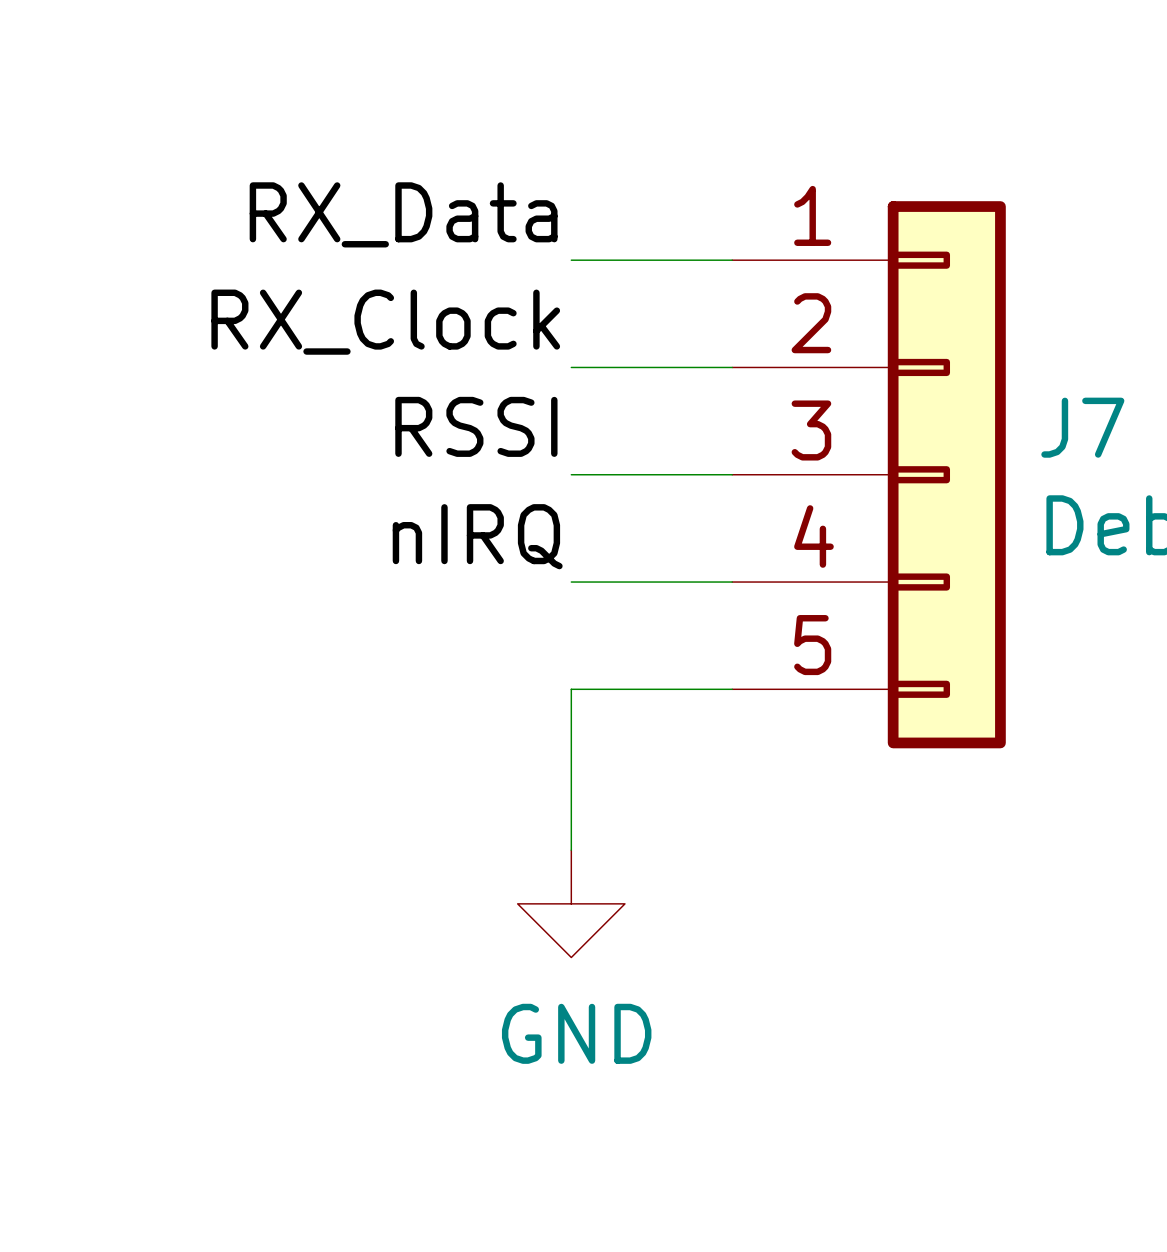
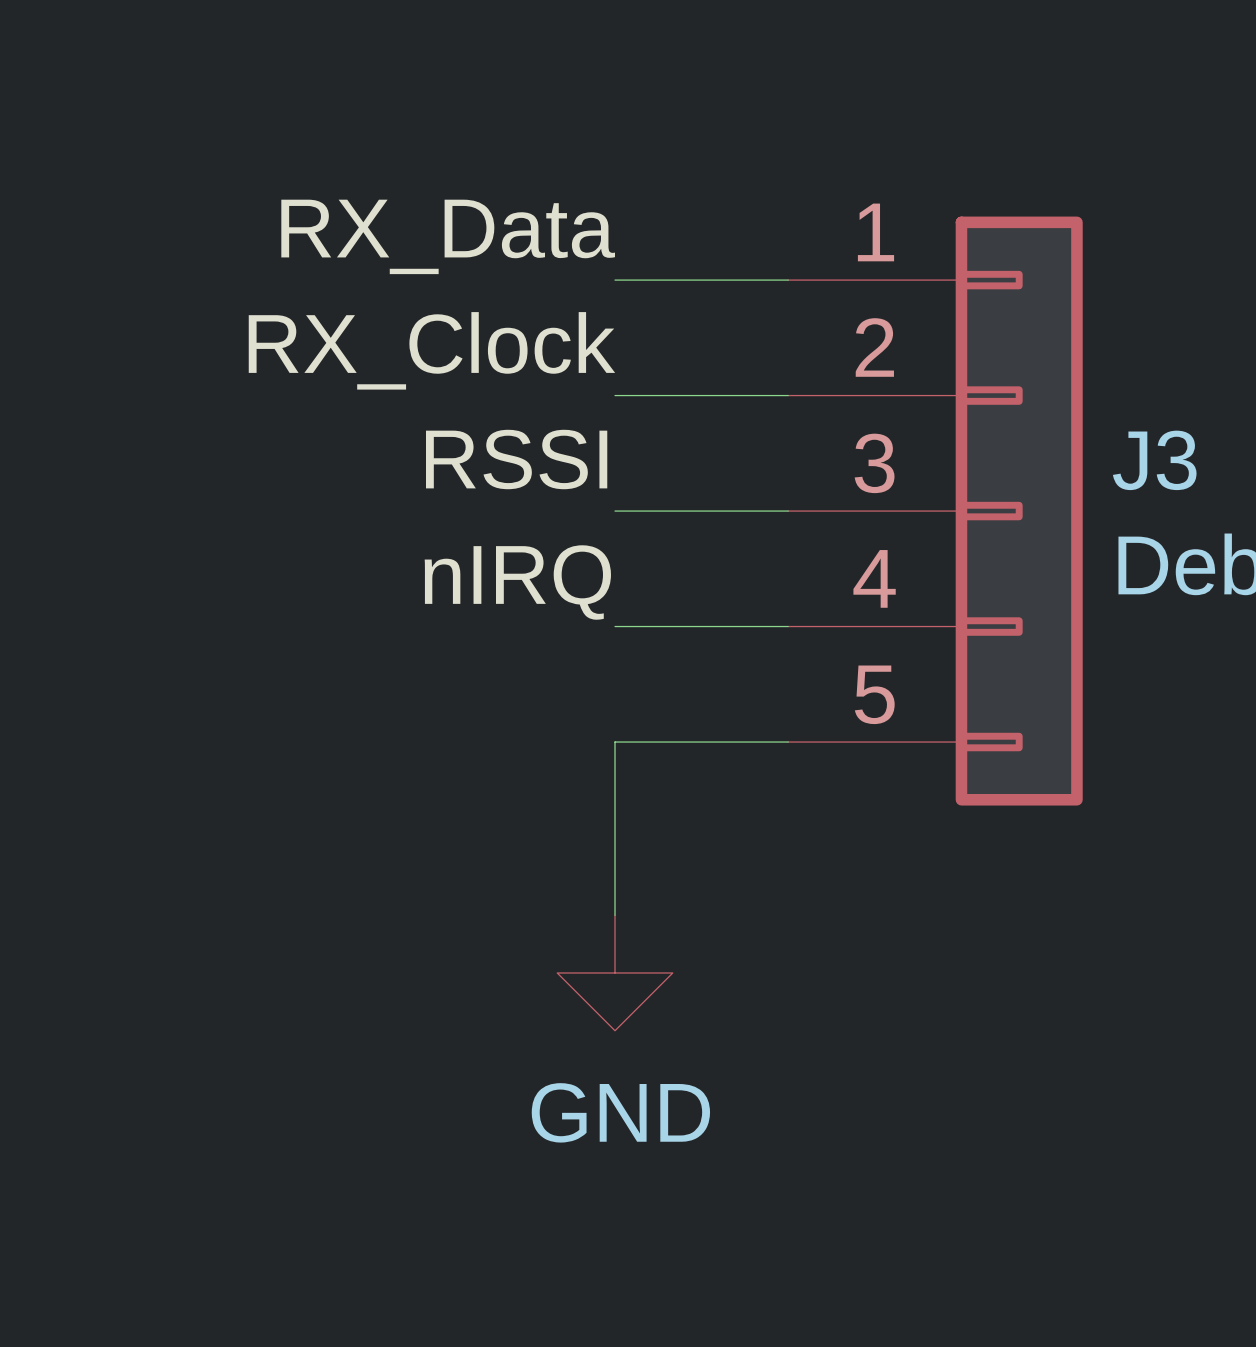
J7 name: J7 (1082, 427) -> J3 (1154, 460)

